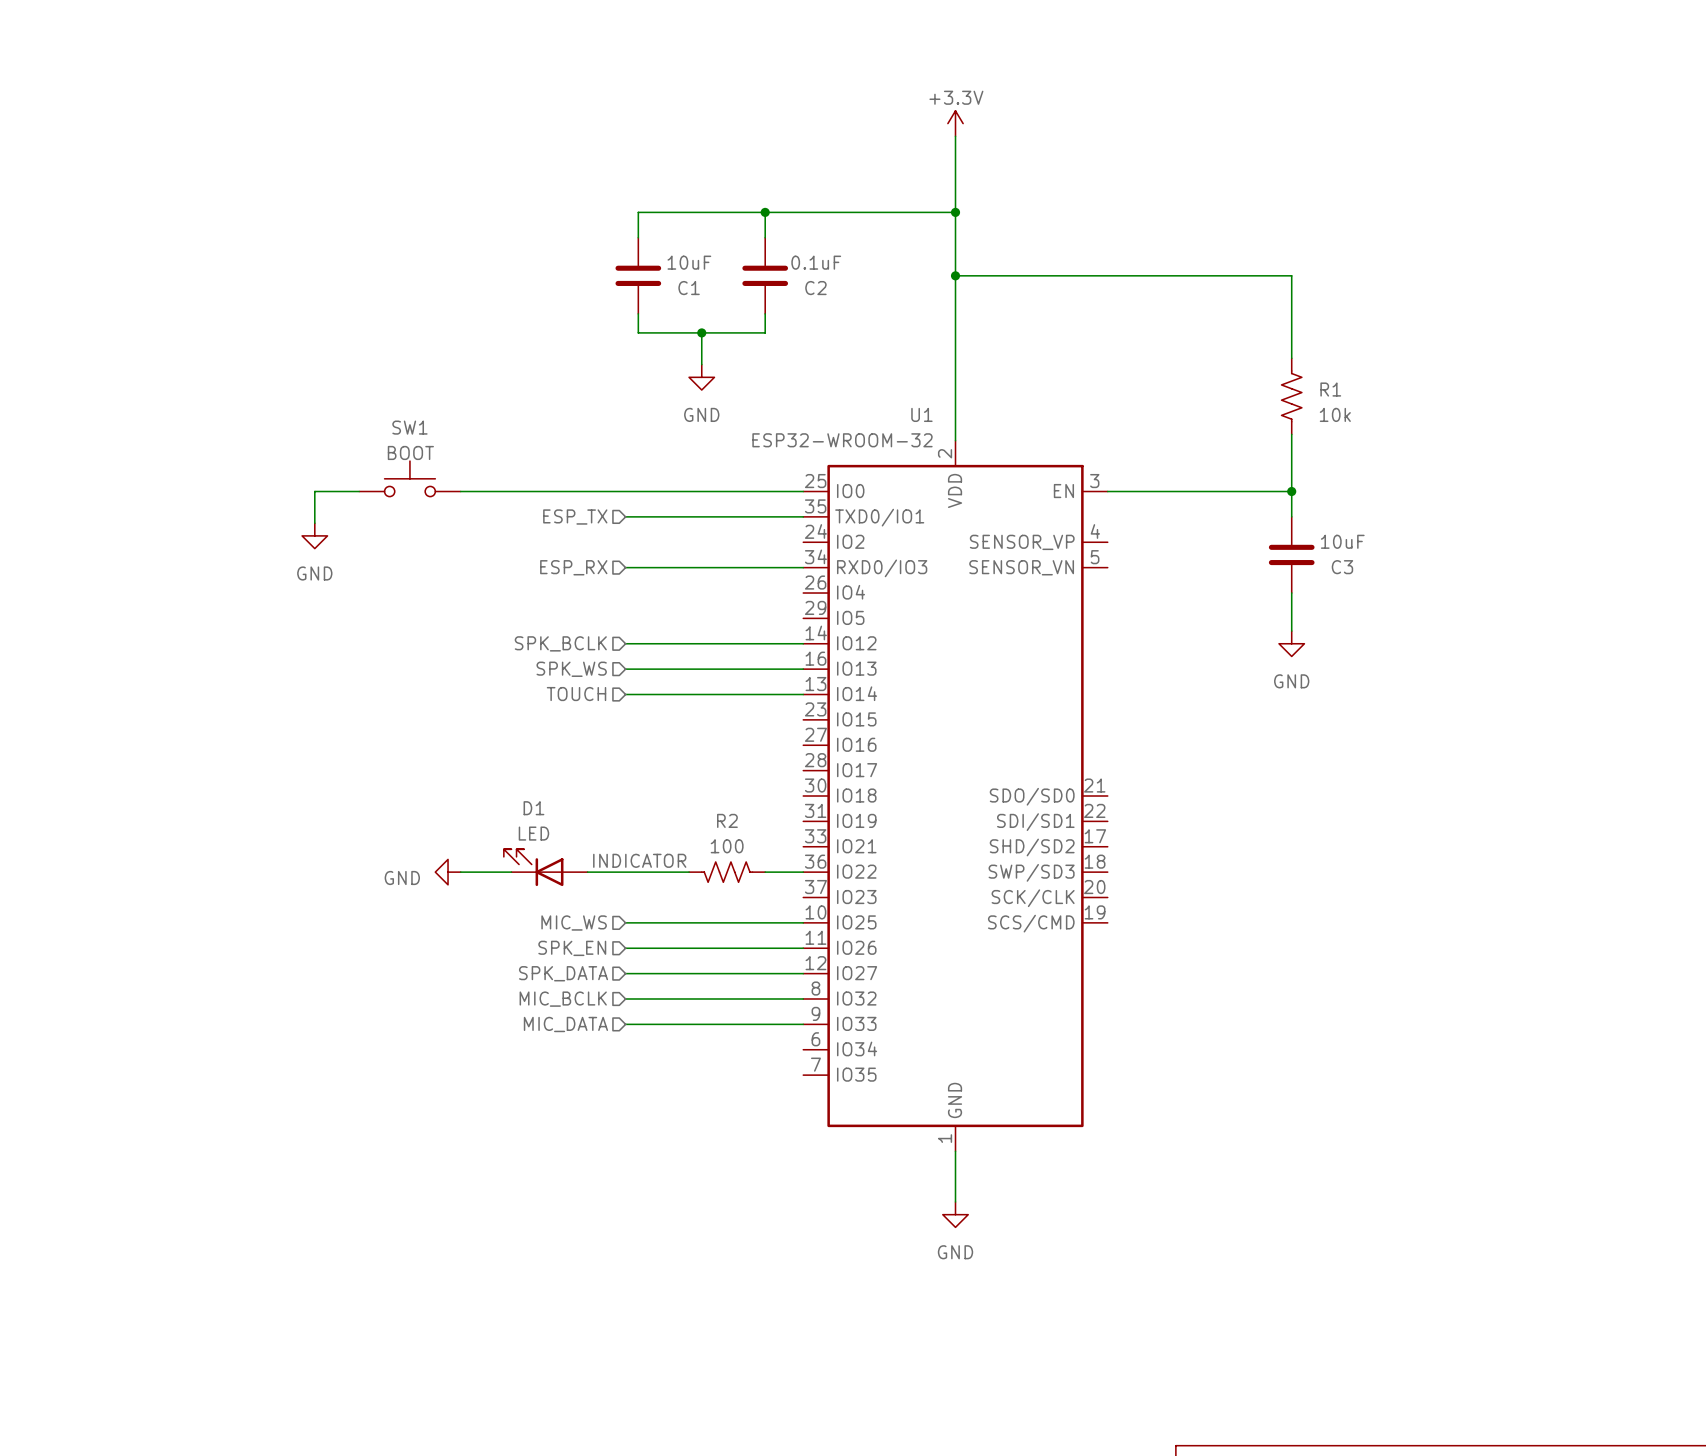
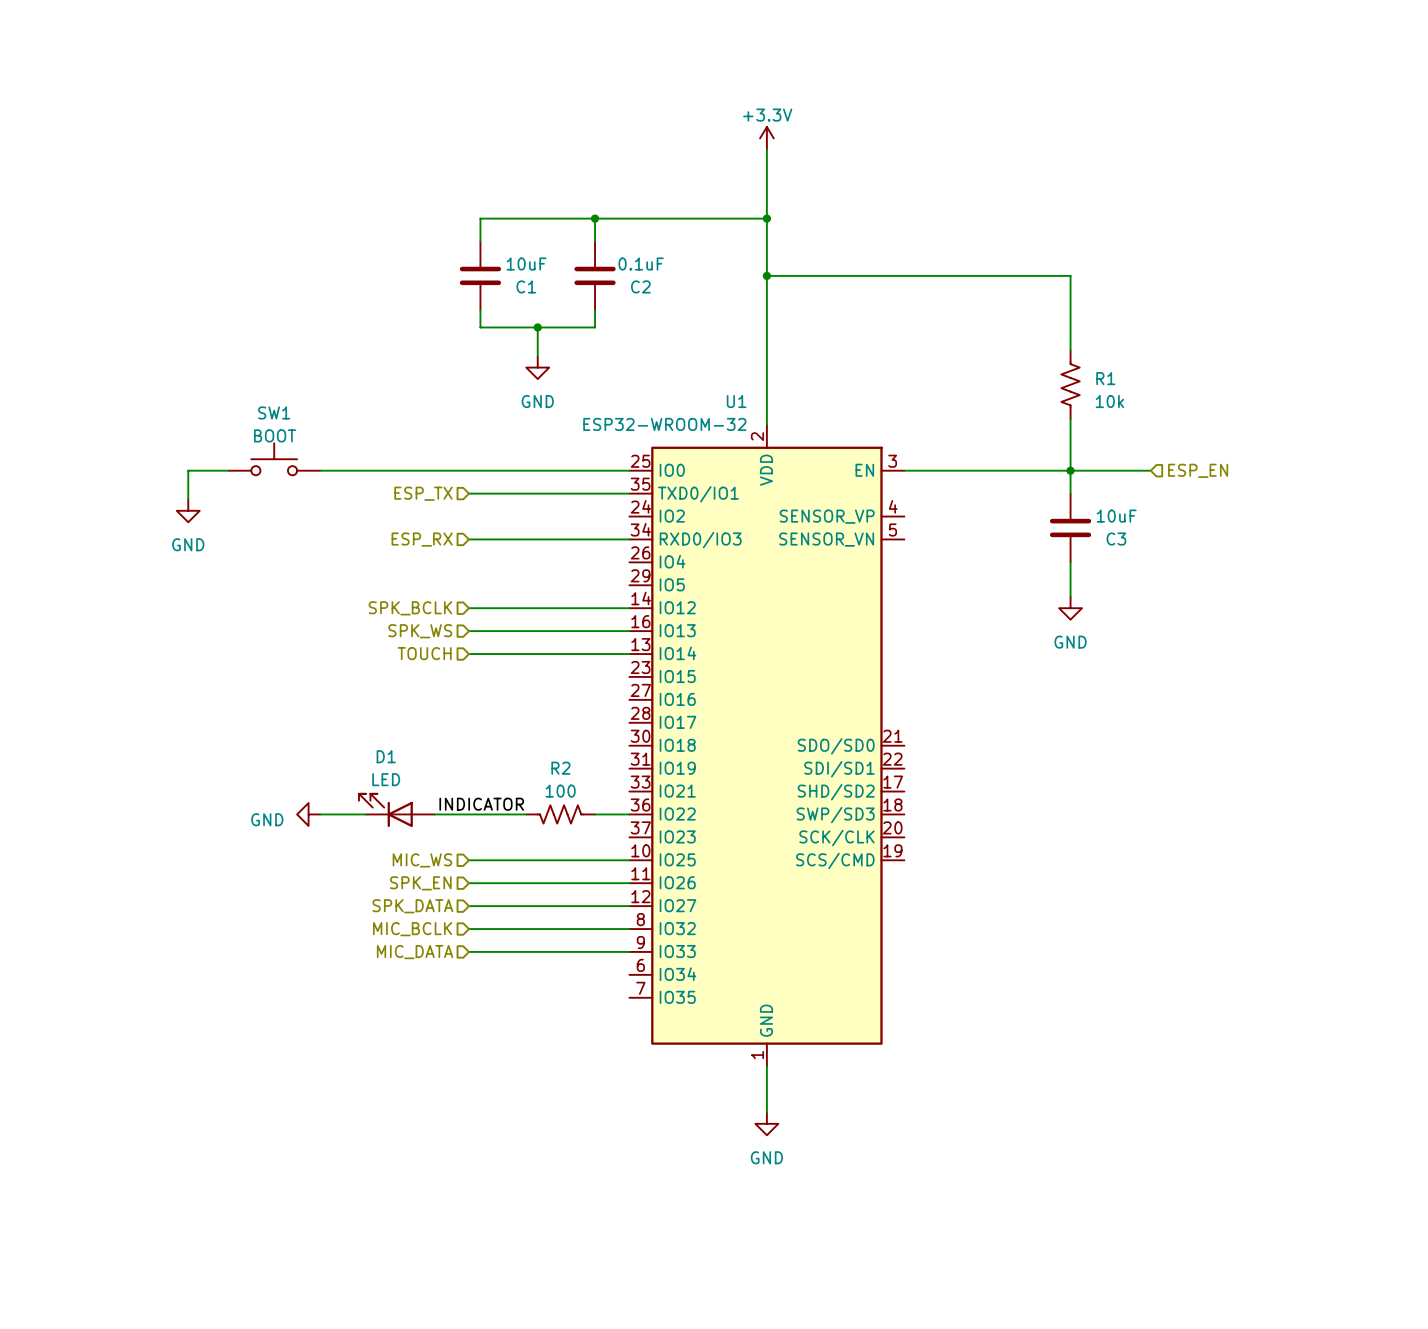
wire: none -> (1070, 470) (1150, 470)
hierarchical label: none -> ESP_EN (1198, 470)

